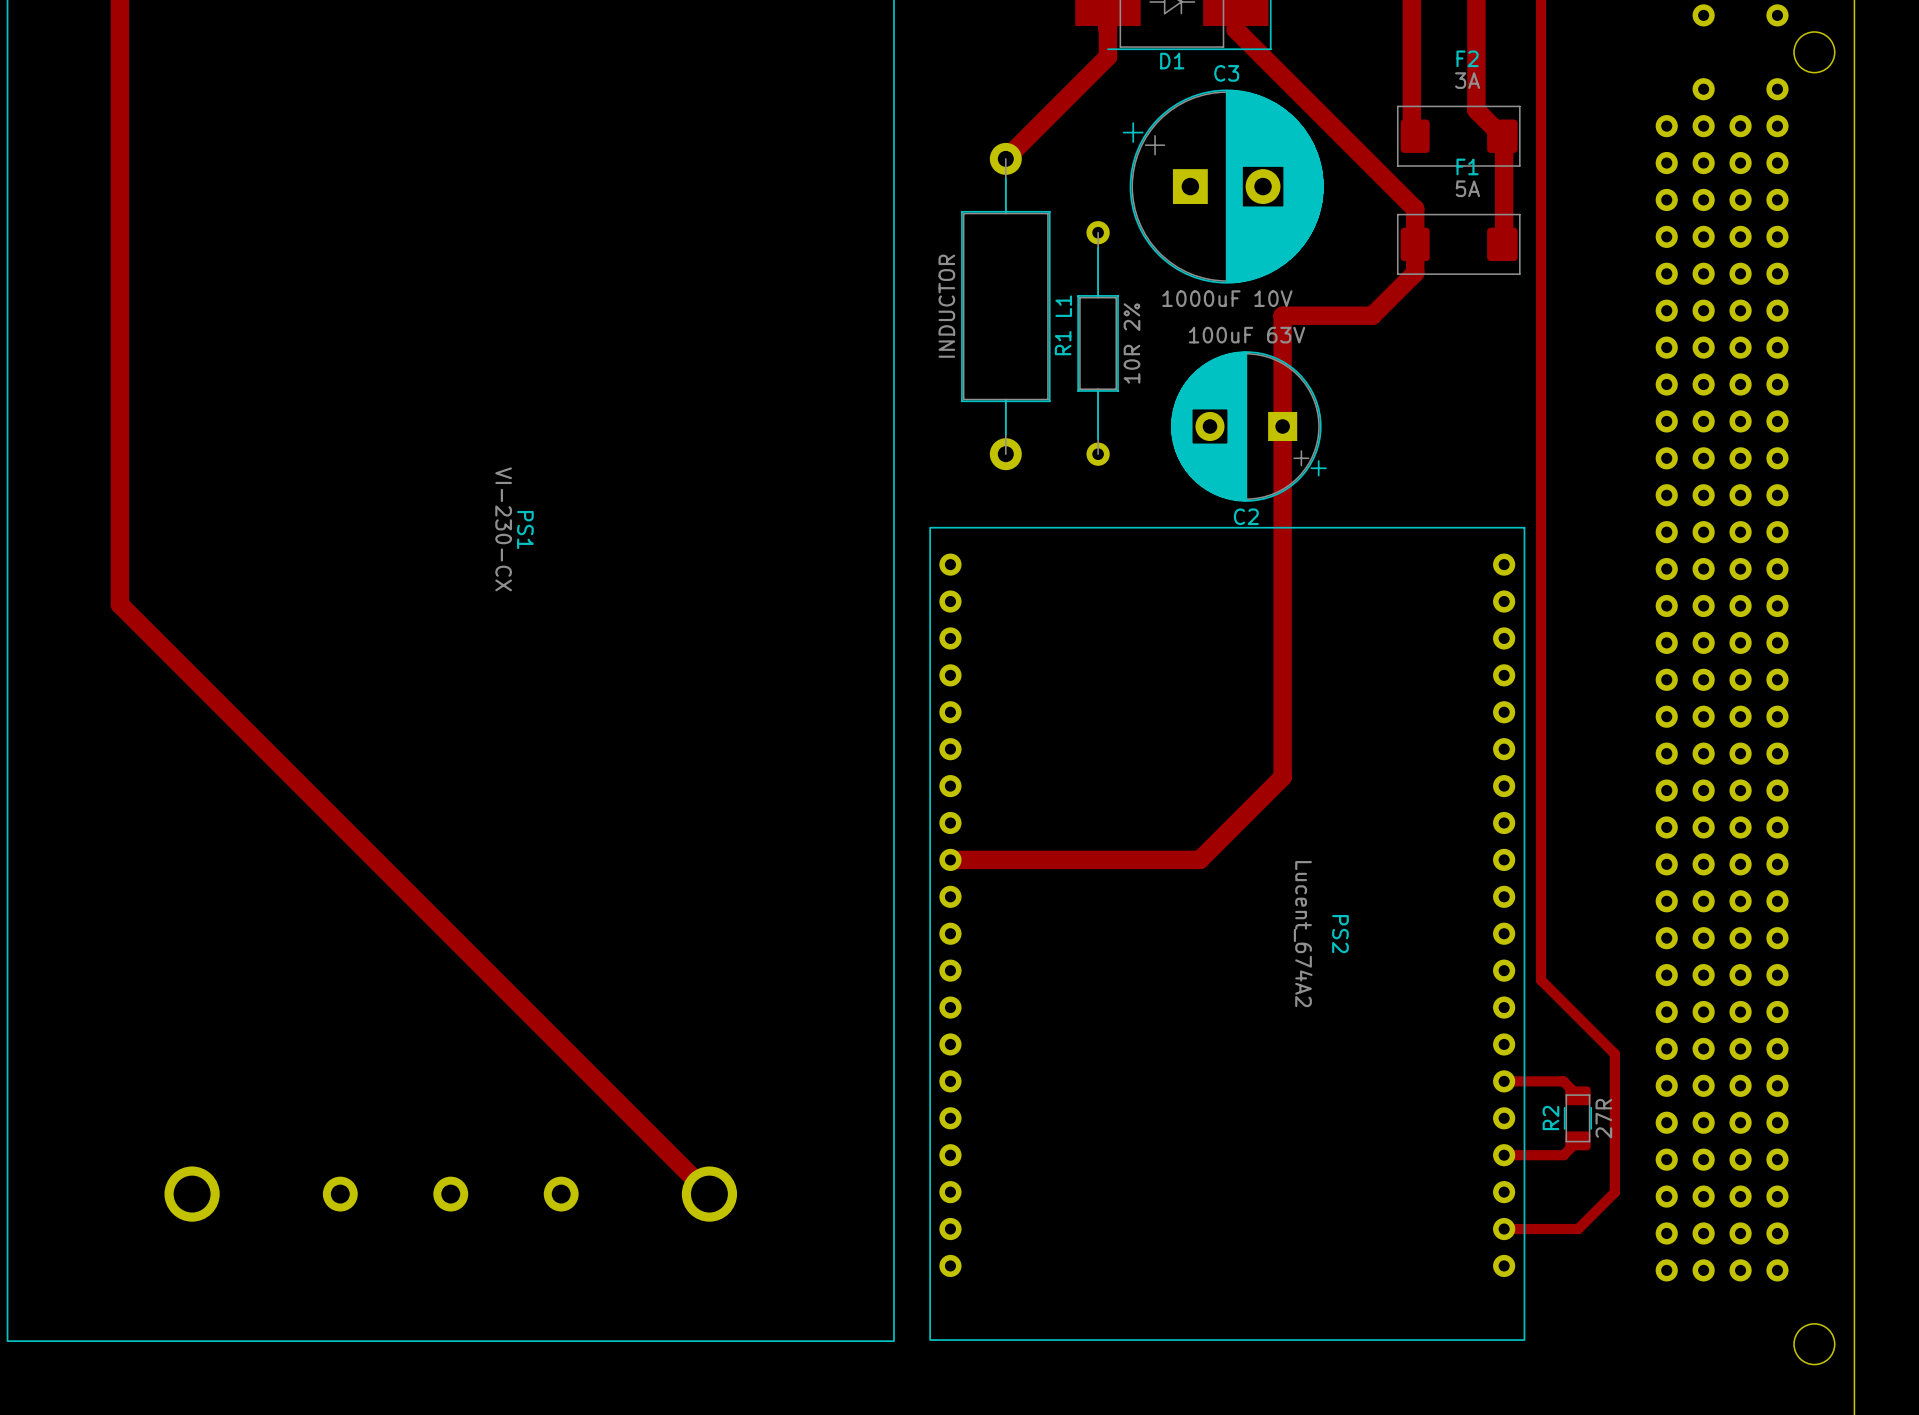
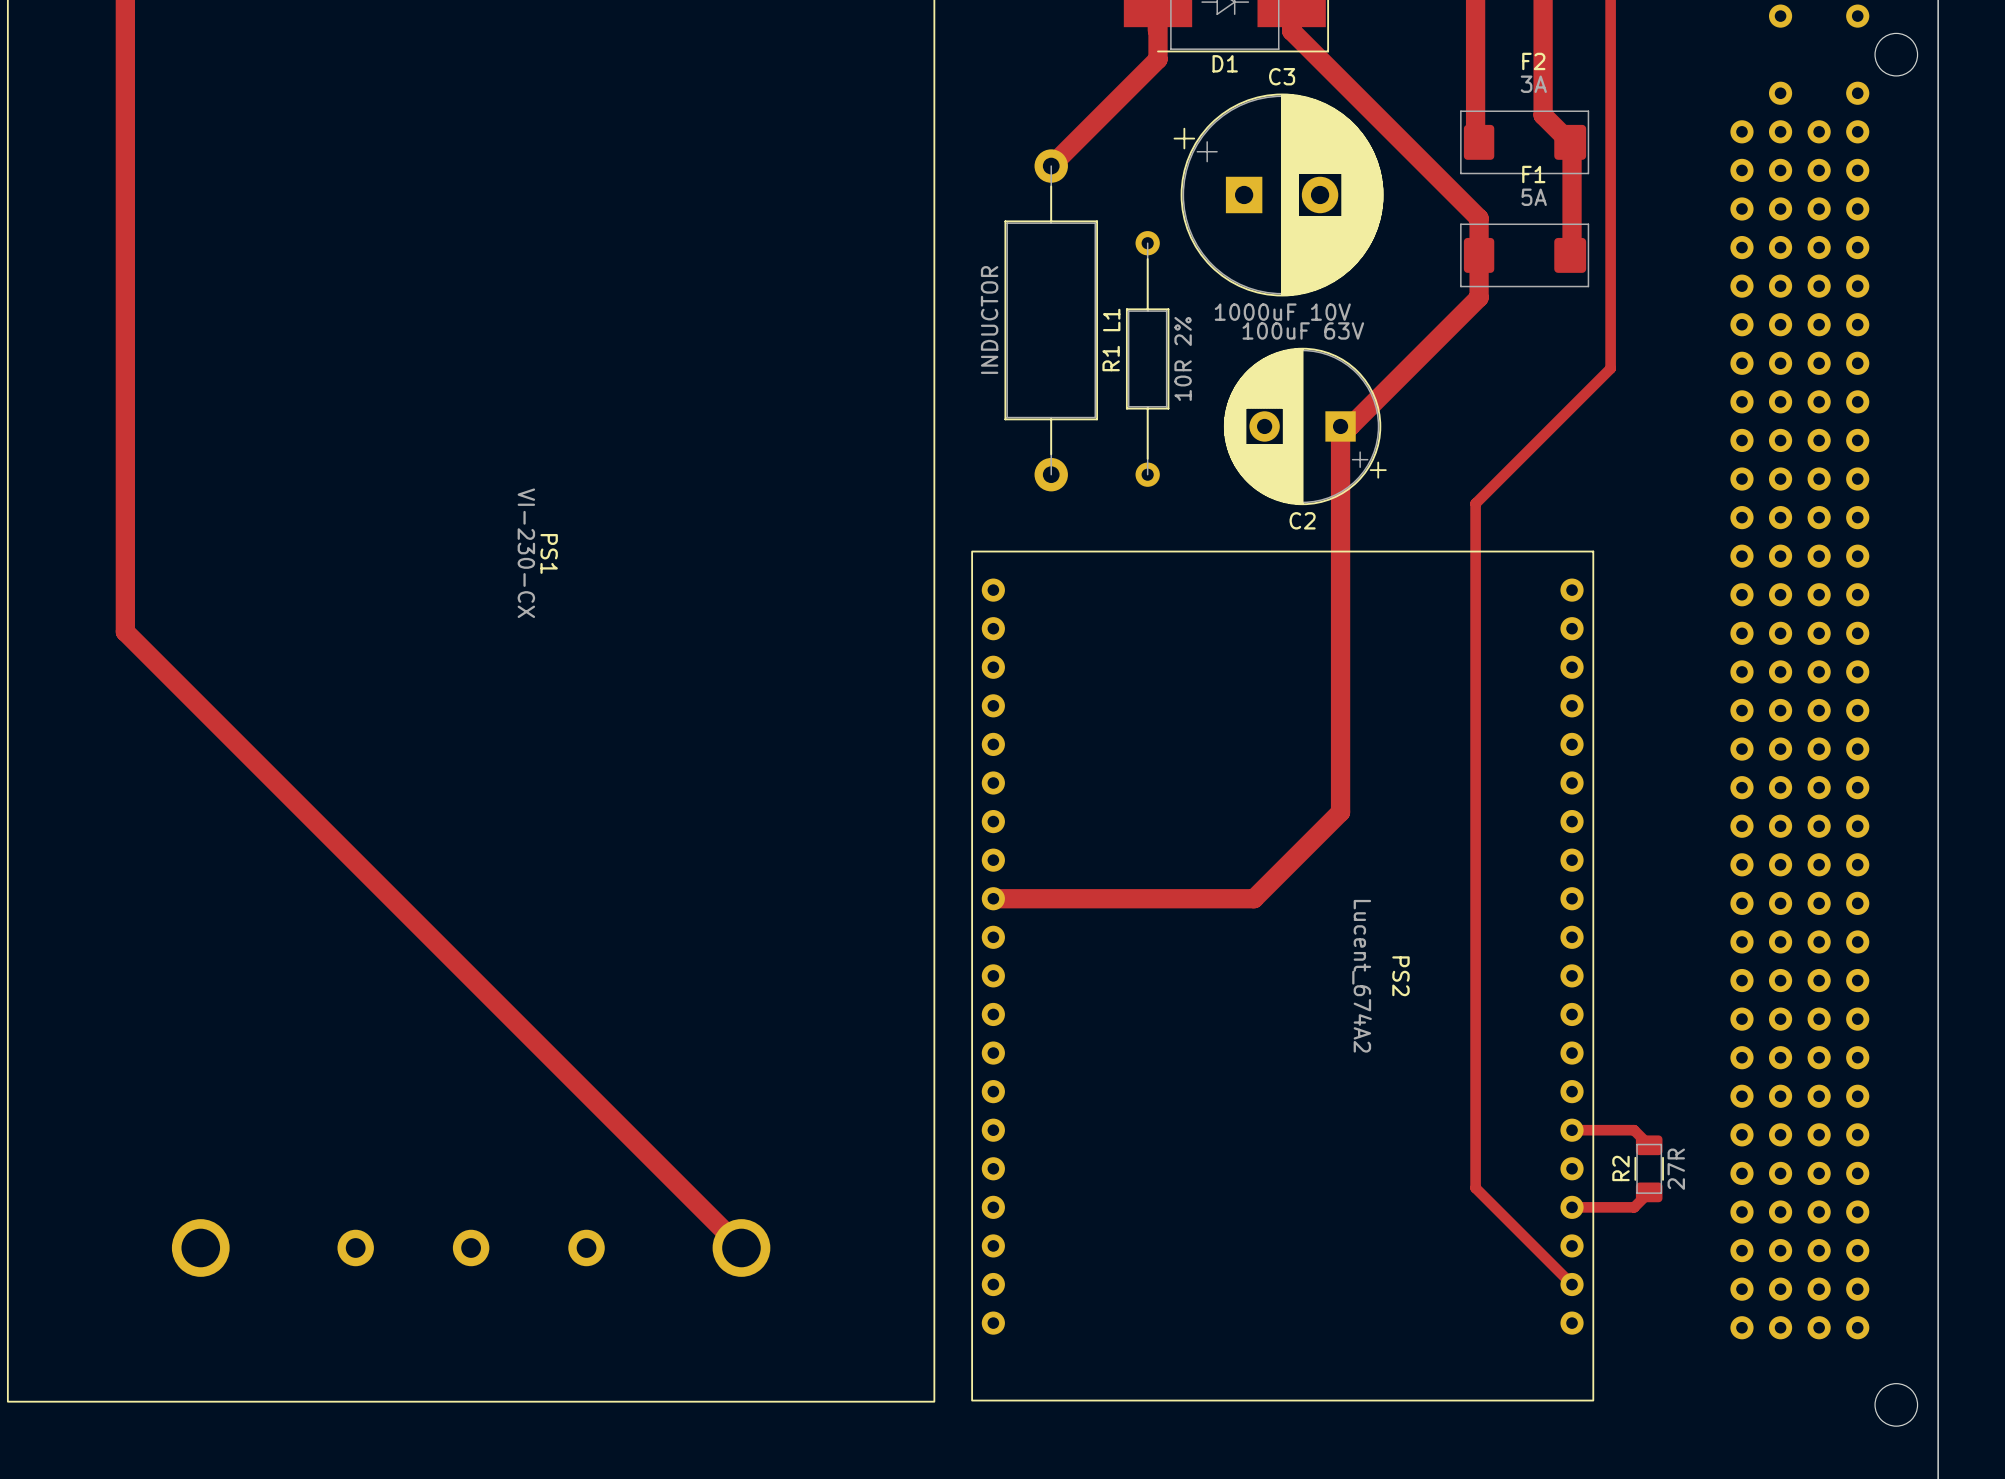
track: (1415, 272) (1372, 315) (1282, 315) (1282, 408) -> (1479, 285) (1479, 297) (1350, 426) (1340, 426)
track: (1541, 352) (1541, 980) (1614, 1053) (1614, 1192) (1578, 1229) (1504, 1229) -> (1610, 368) (1475, 503) (1475, 1188) (1572, 1284)
C2 position: (1248, 426) -> (1305, 426)

